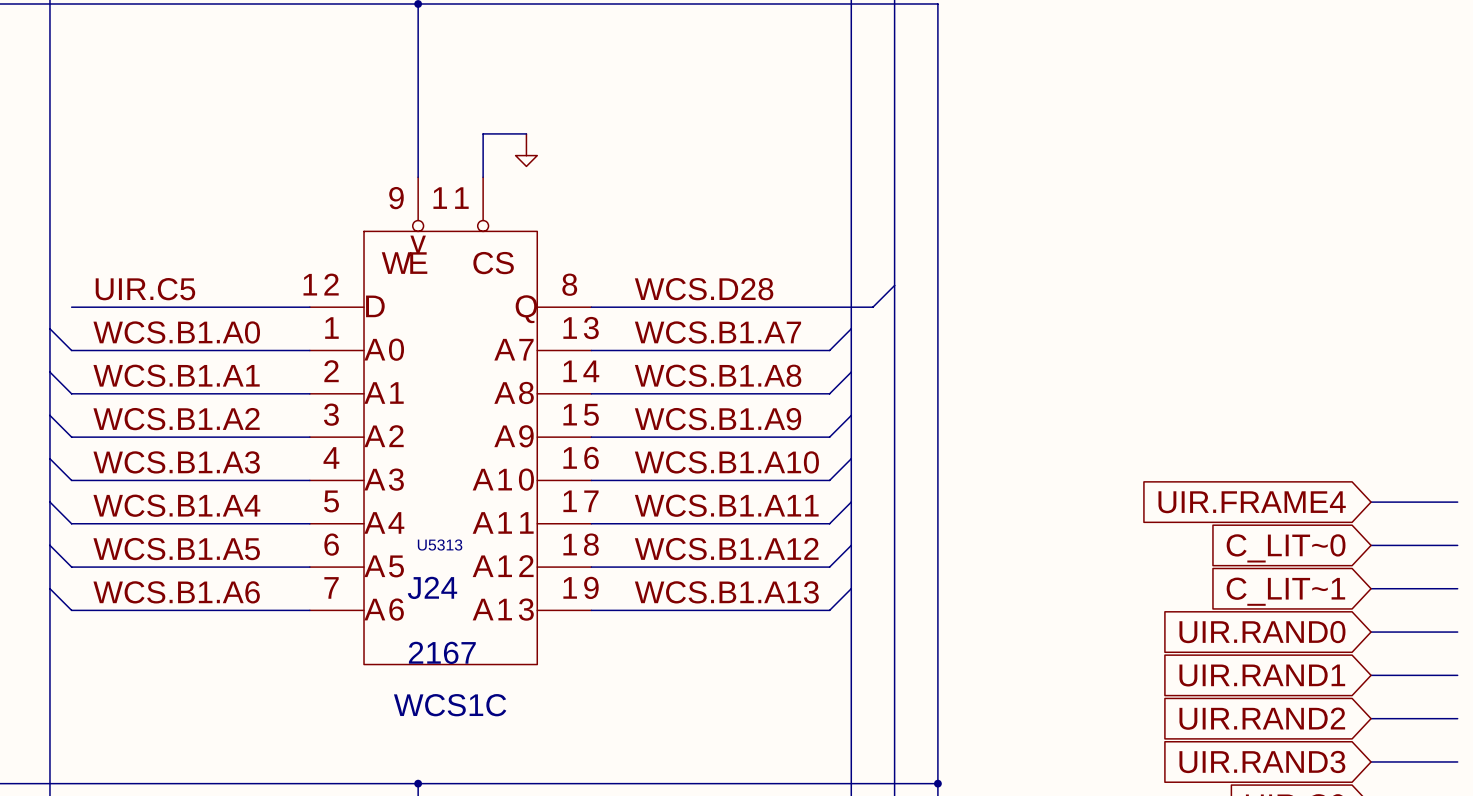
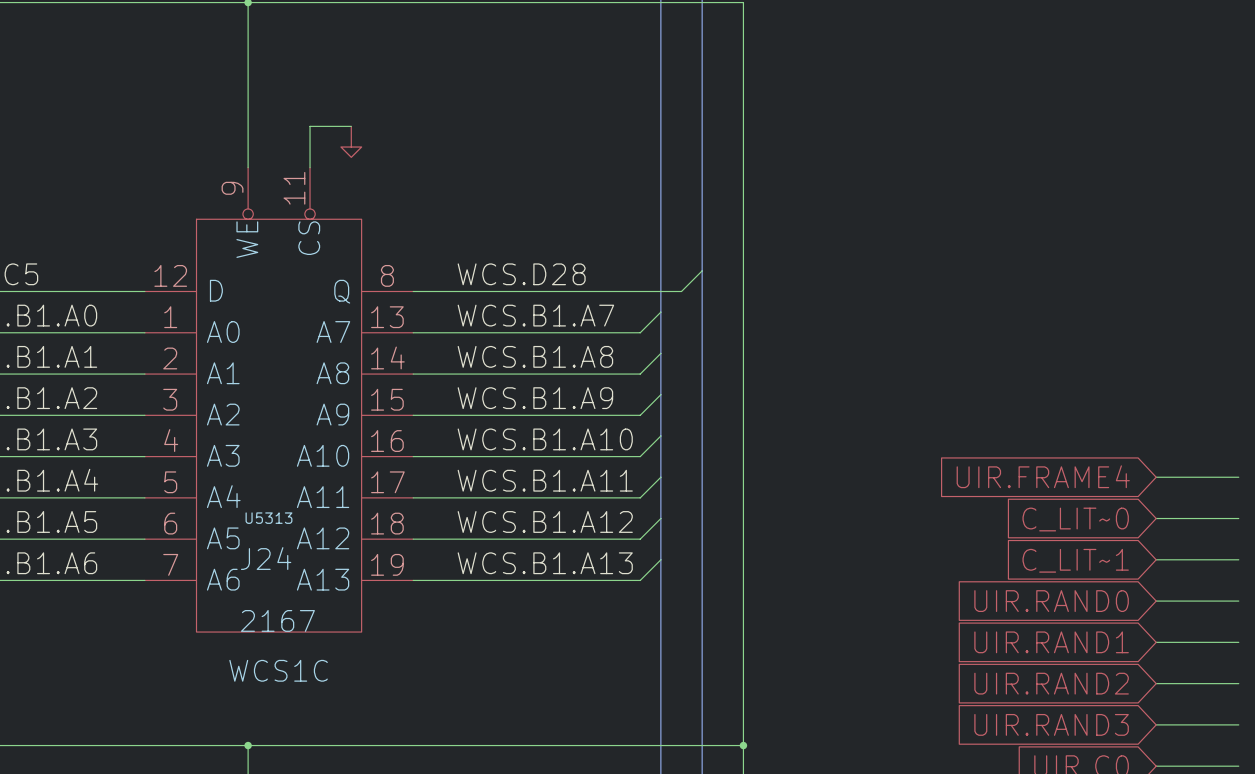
U5313 symbol: [309, 177, 592, 665] -> [144, 167, 414, 633]

